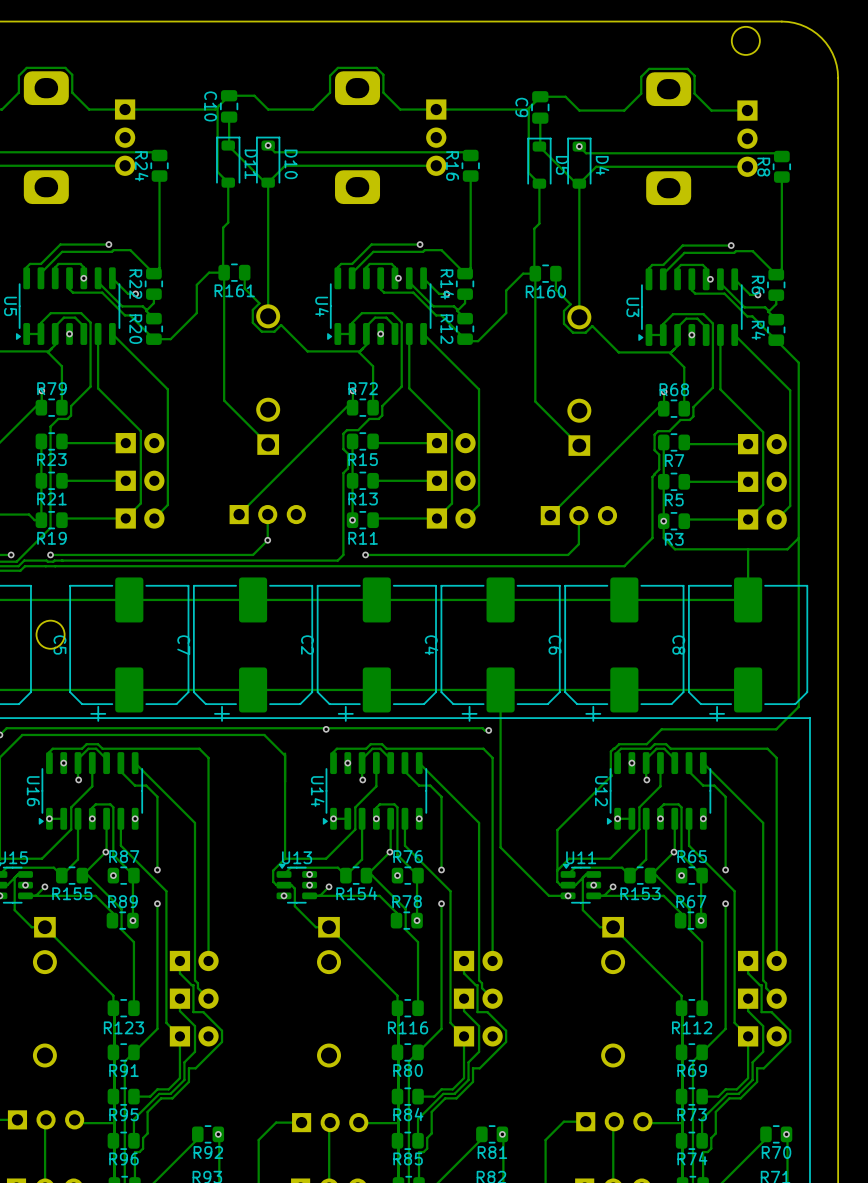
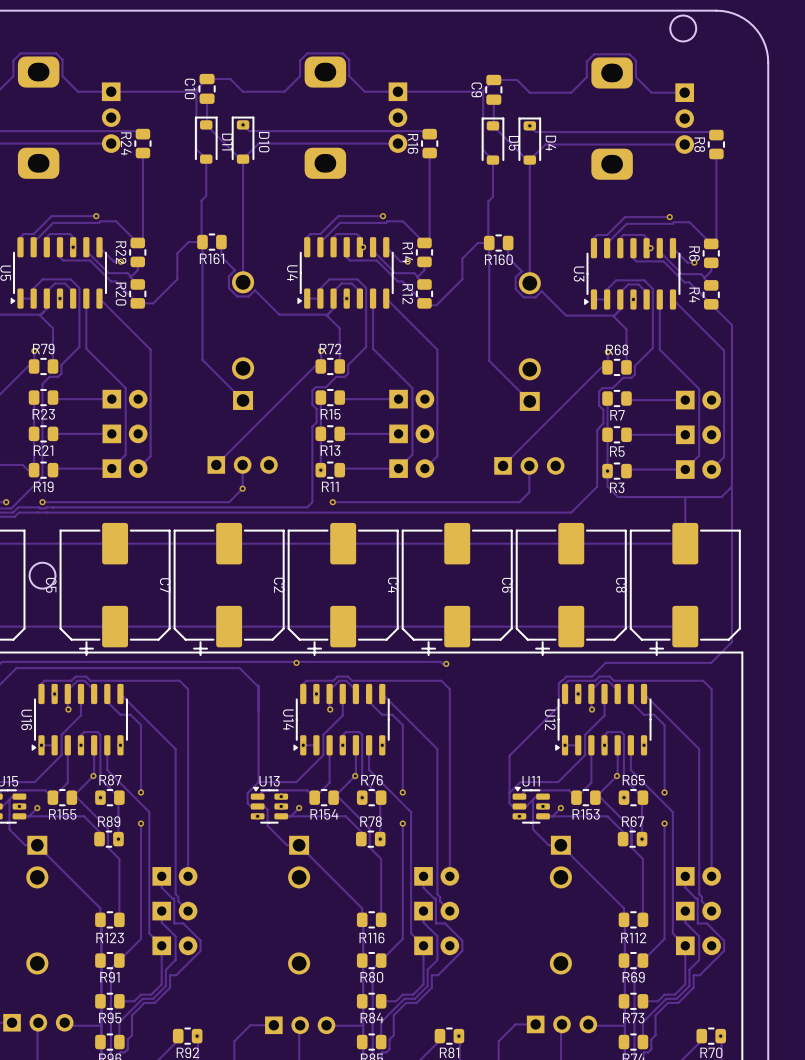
track: (500, 689) (500, 847) (548, 895) (568, 895) -> none

